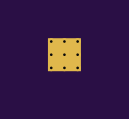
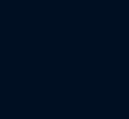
part: (64, 54) -> none

